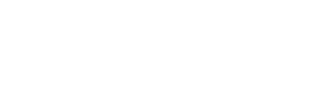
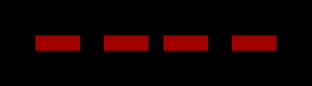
part: none -> (91, 43)
part: none -> (219, 43)

